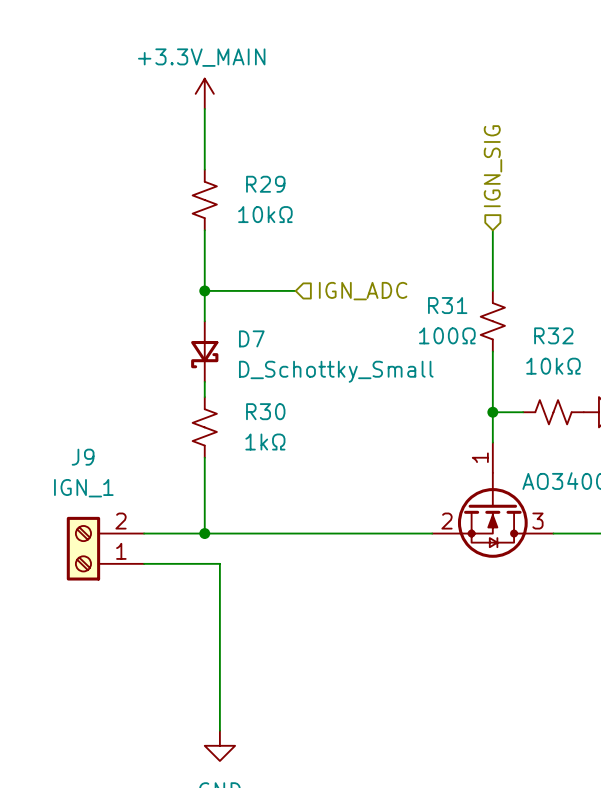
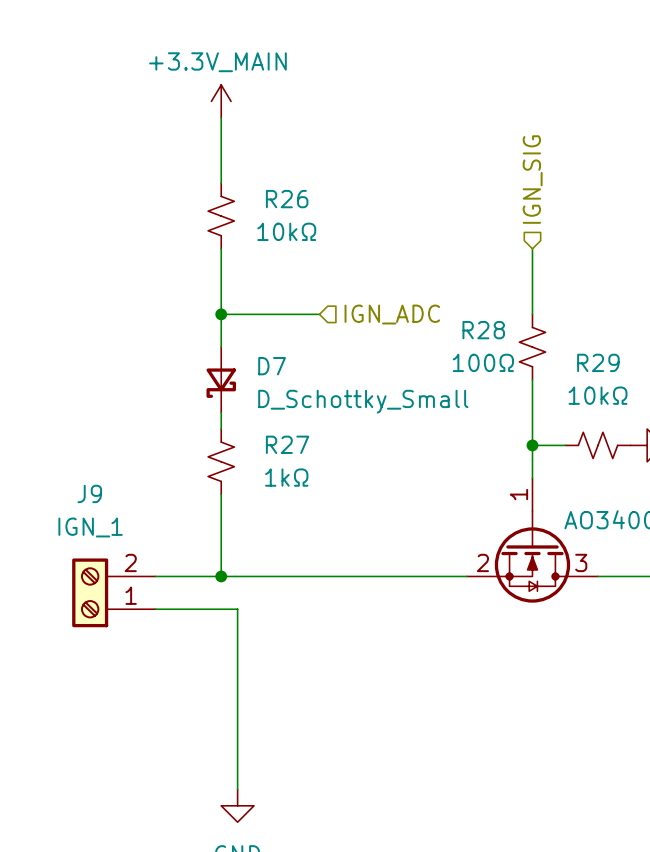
R29 name: R29 (265, 184) -> R26 (287, 199)
R31 name: R31 (447, 305) -> R28 (483, 330)
R32 name: R32 (553, 335) -> R29 (598, 362)
R30 name: R30 (265, 411) -> R27 (287, 444)

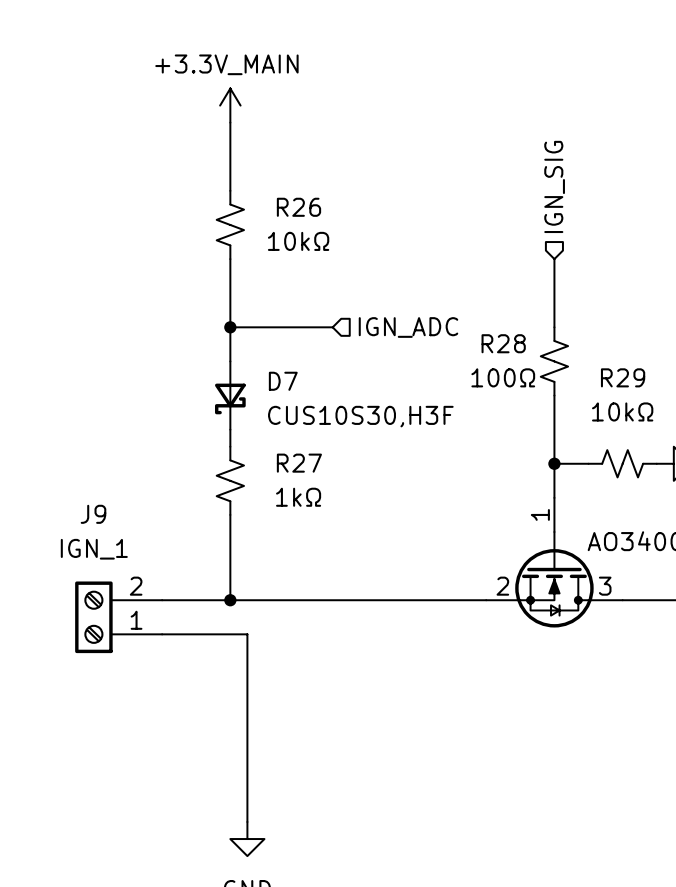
D7 value: D_Schottky_Small (363, 401) -> CUS10S30,H3F (360, 416)

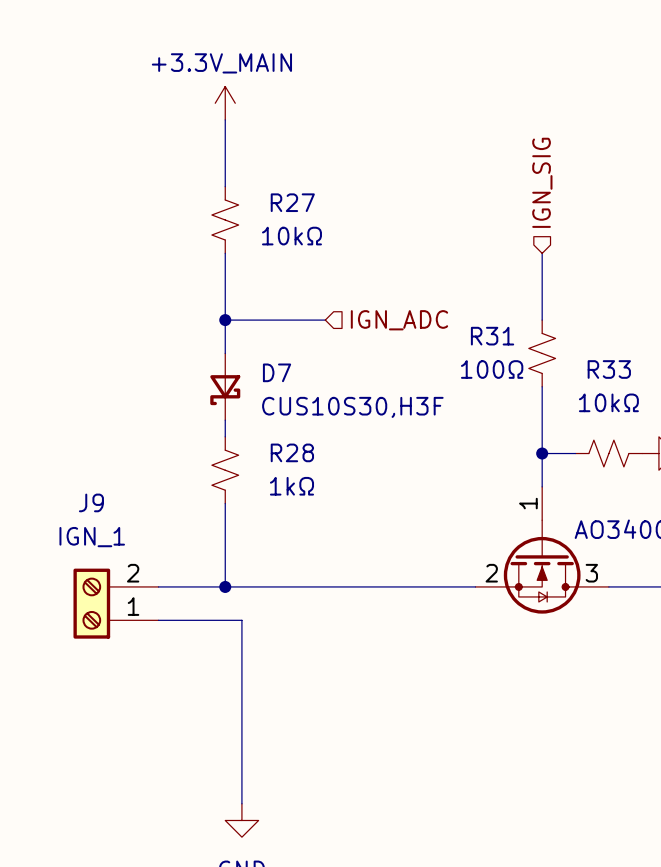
R26 name: R26 (298, 207) -> R27 (292, 202)
R28 name: R28 (503, 343) -> R31 (492, 336)
R29 name: R29 (623, 377) -> R33 (609, 369)
R27 name: R27 (299, 463) -> R28 (292, 452)

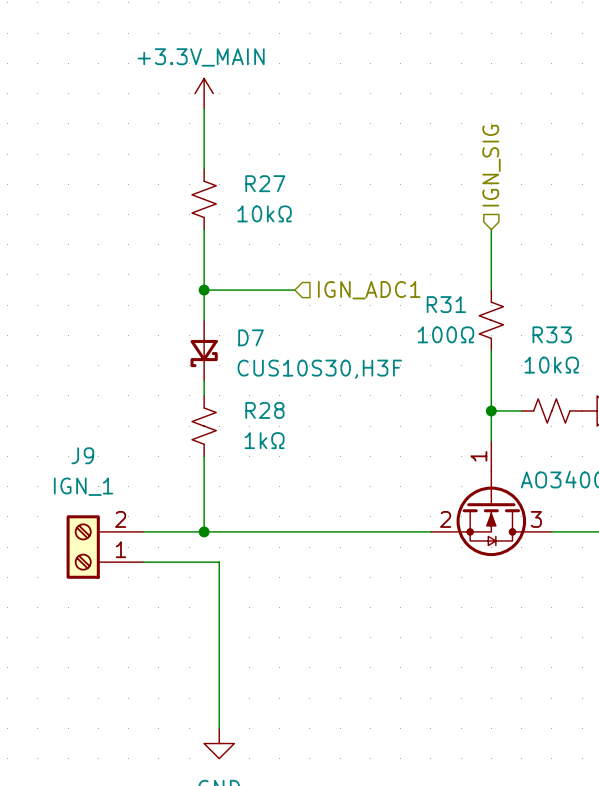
hierarchical label: IGN_ADC (399, 320) -> IGN_ADC1 (369, 290)

